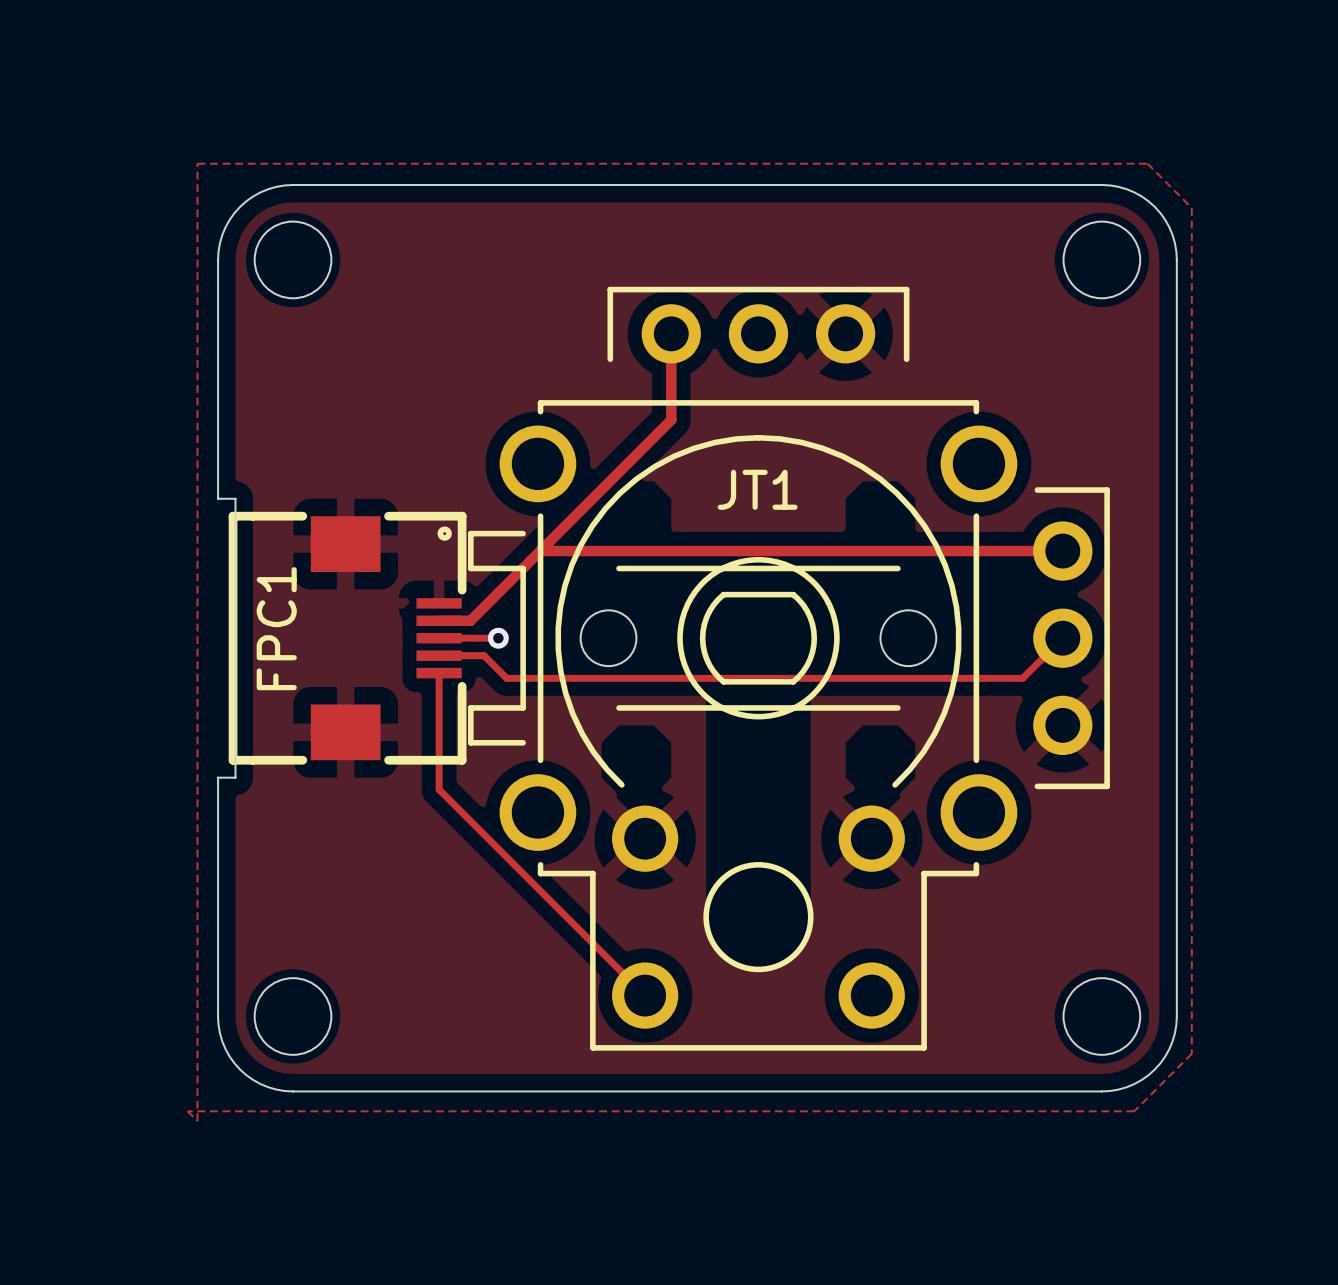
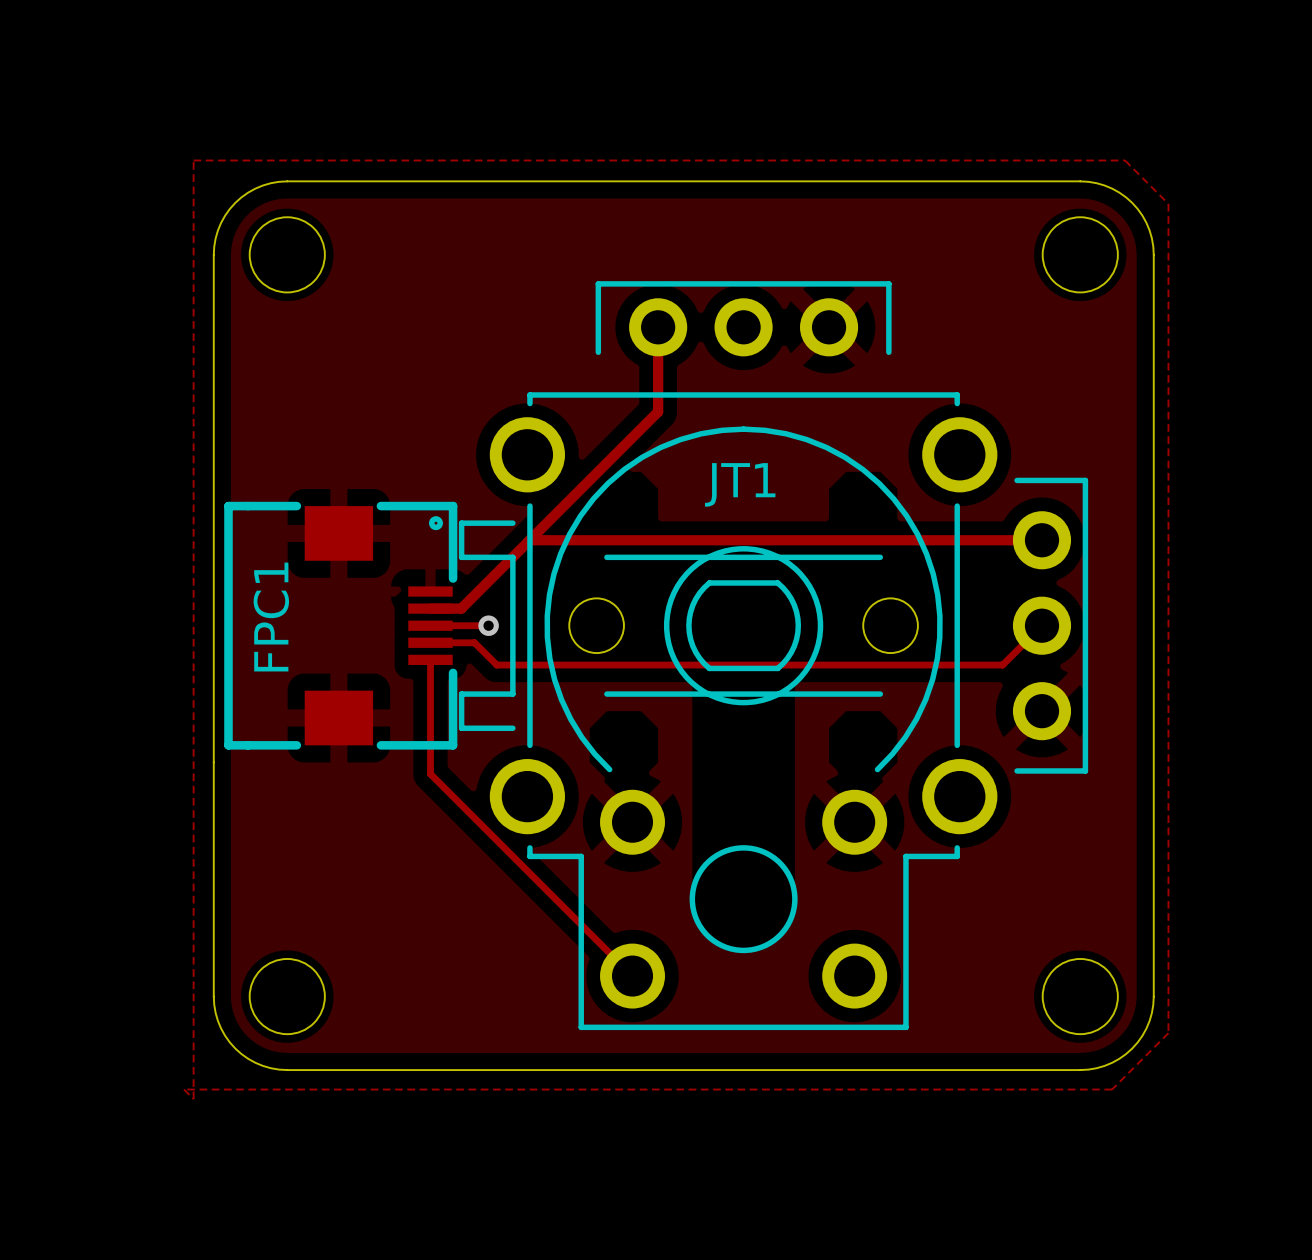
board edge: (218, 498) (235, 498) (235, 777) (218, 777) -> (213, 488) (213, 762)

